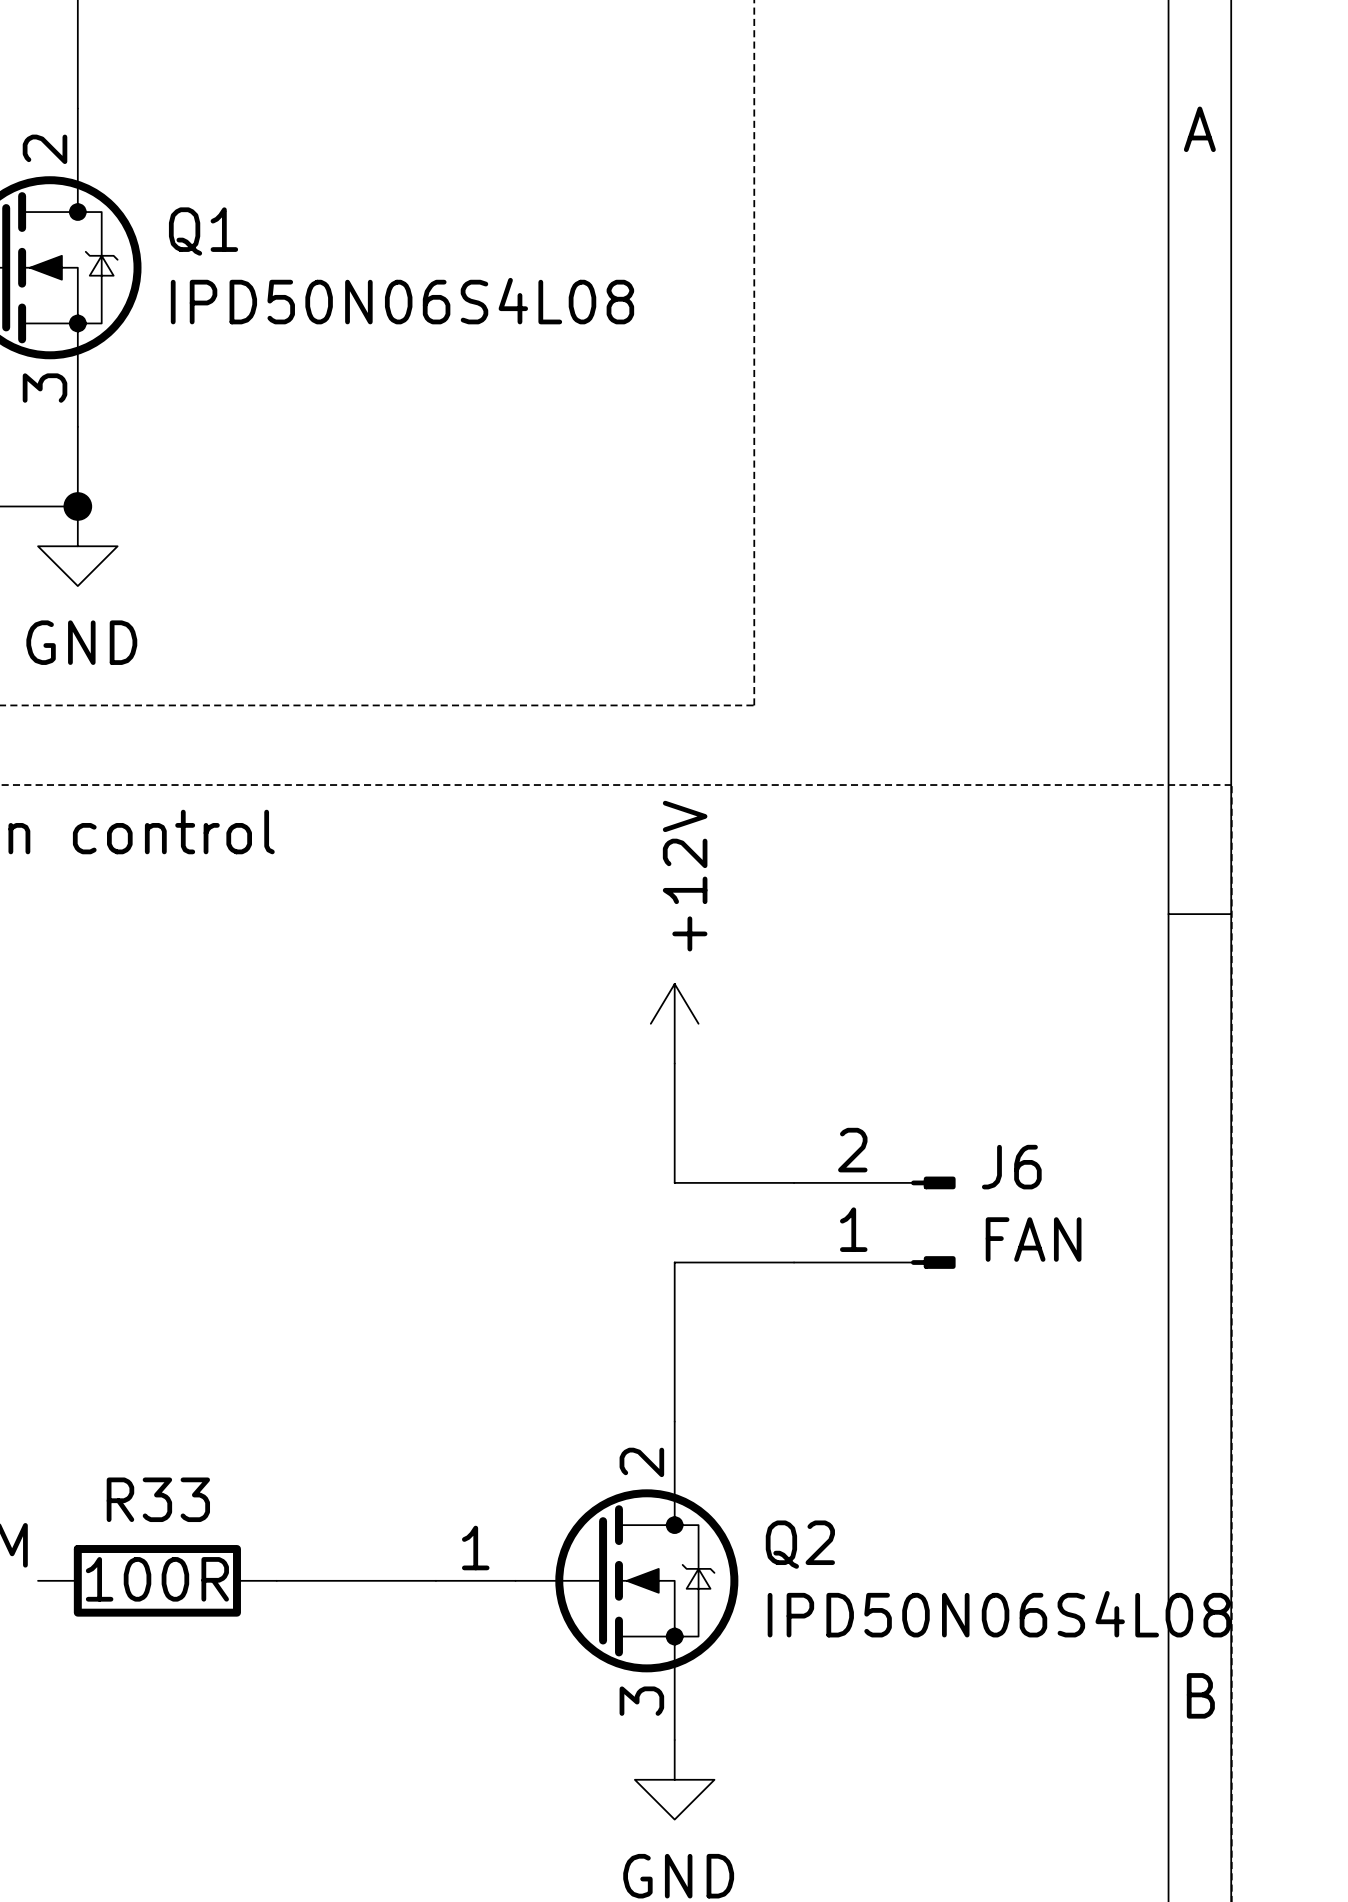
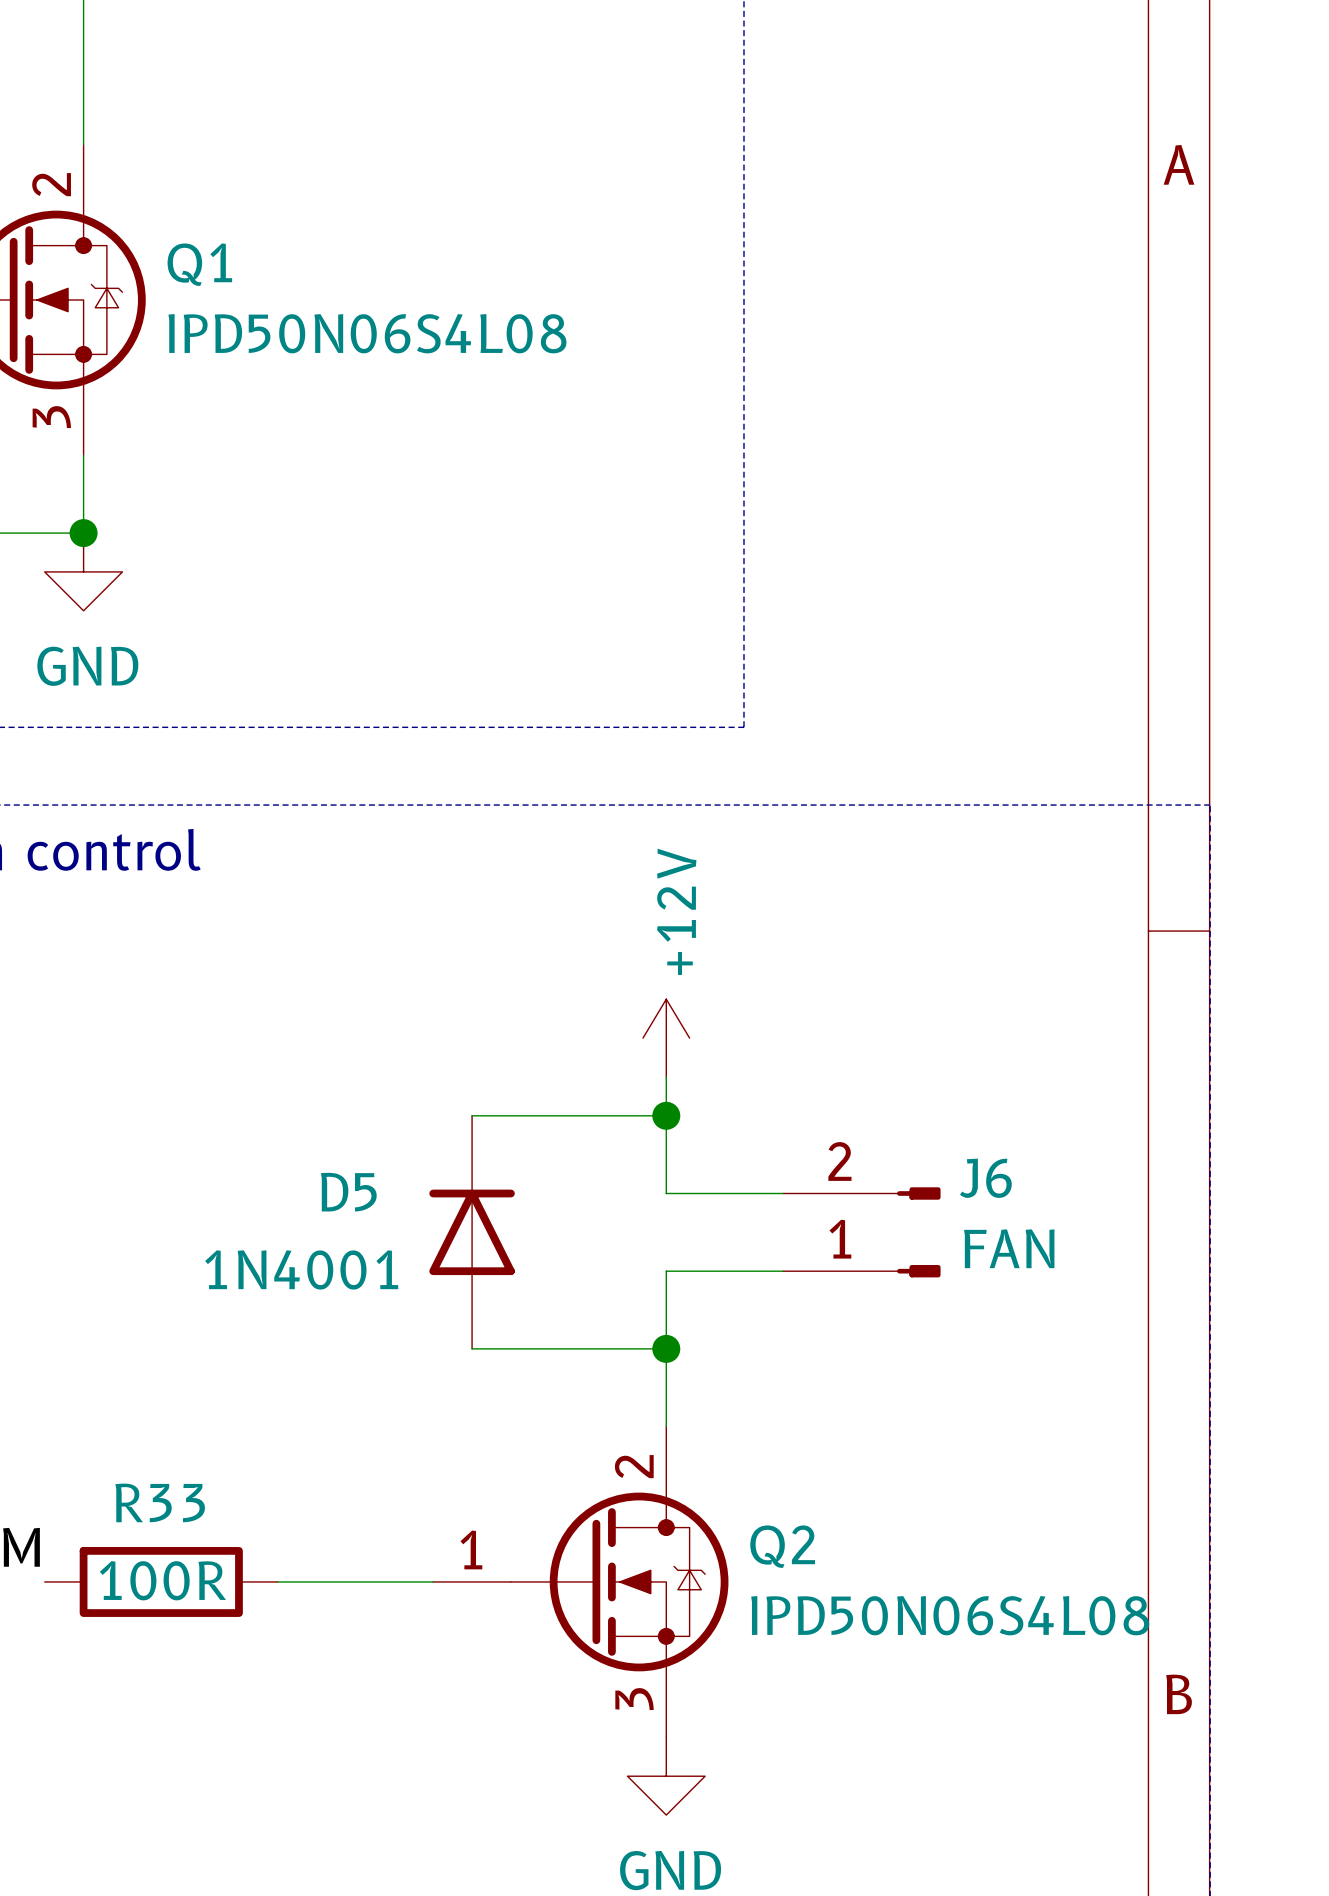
wire: none -> (472, 1115) (666, 1115)
junction: none -> (666, 1115)
D5: none -> 1N4001 (472, 1232)
wire: none -> (472, 1348) (666, 1348)
junction: none -> (666, 1348)

